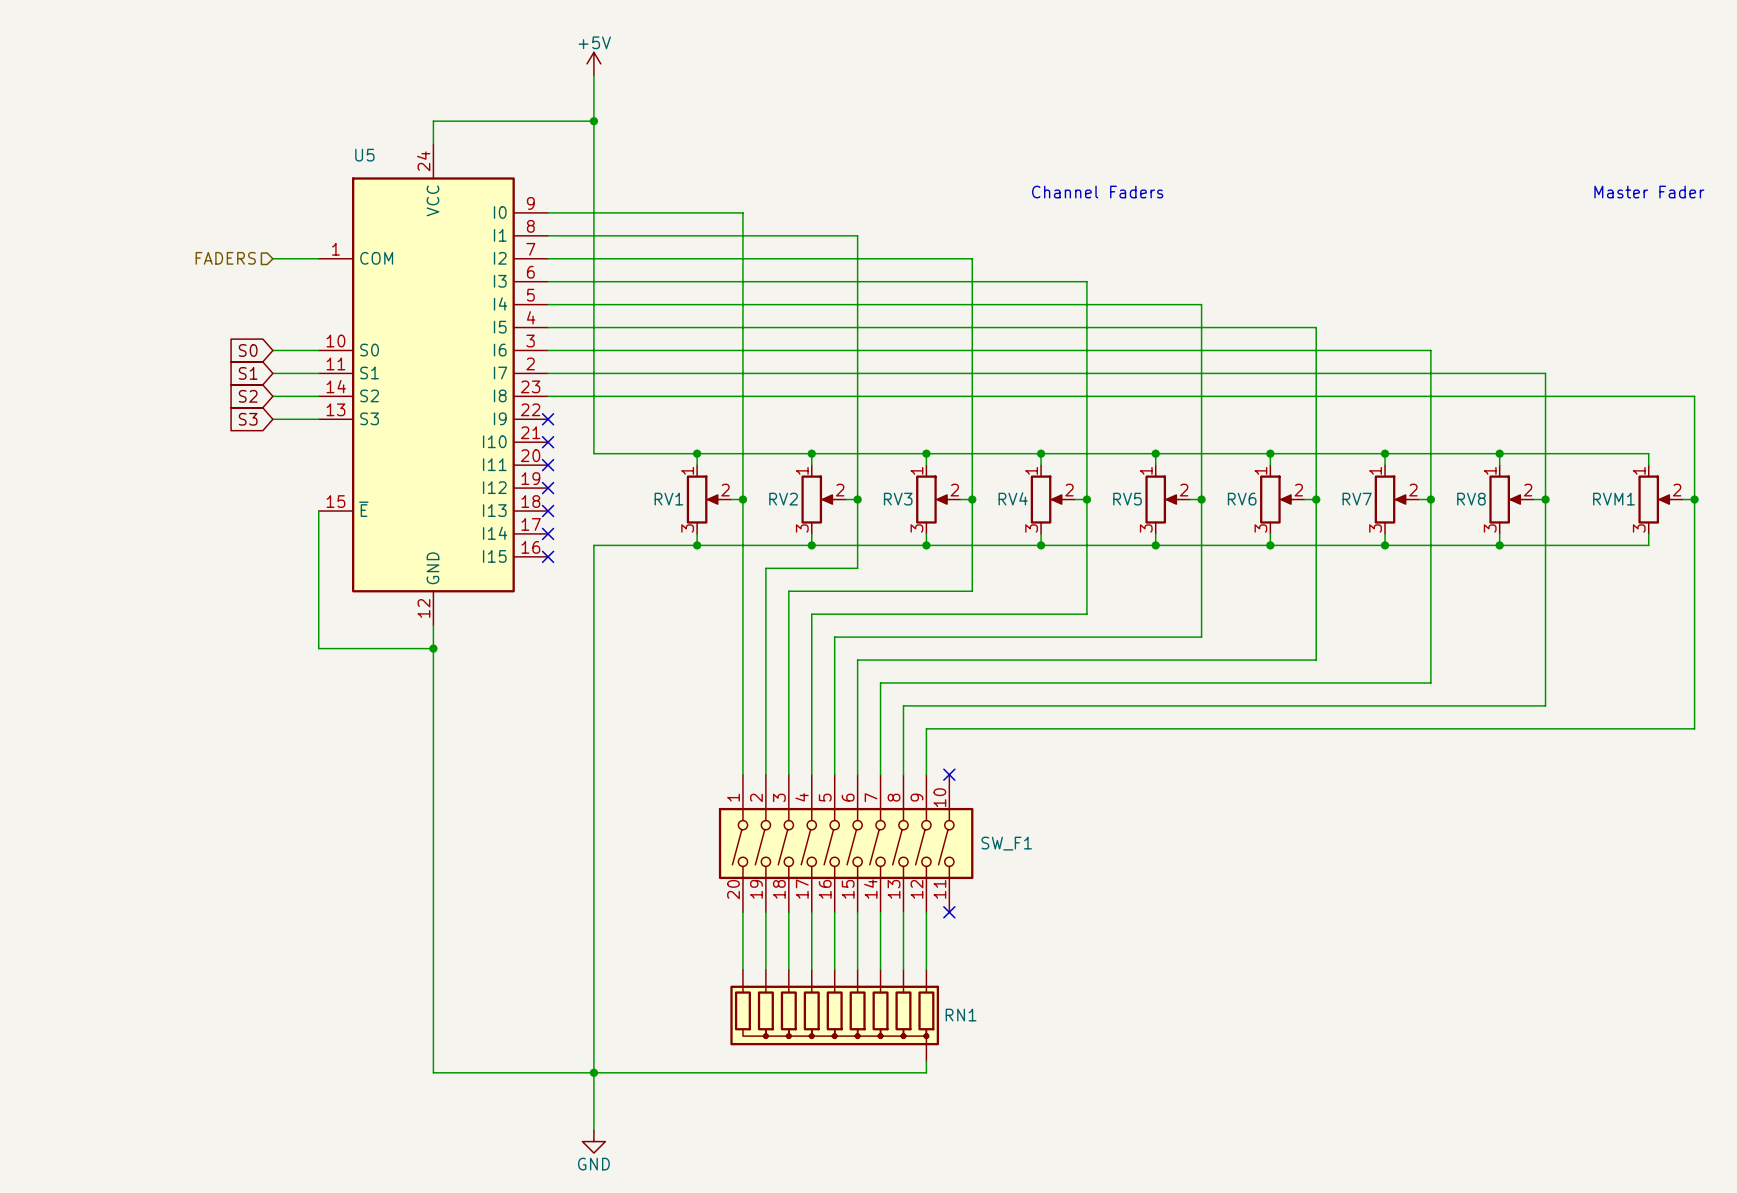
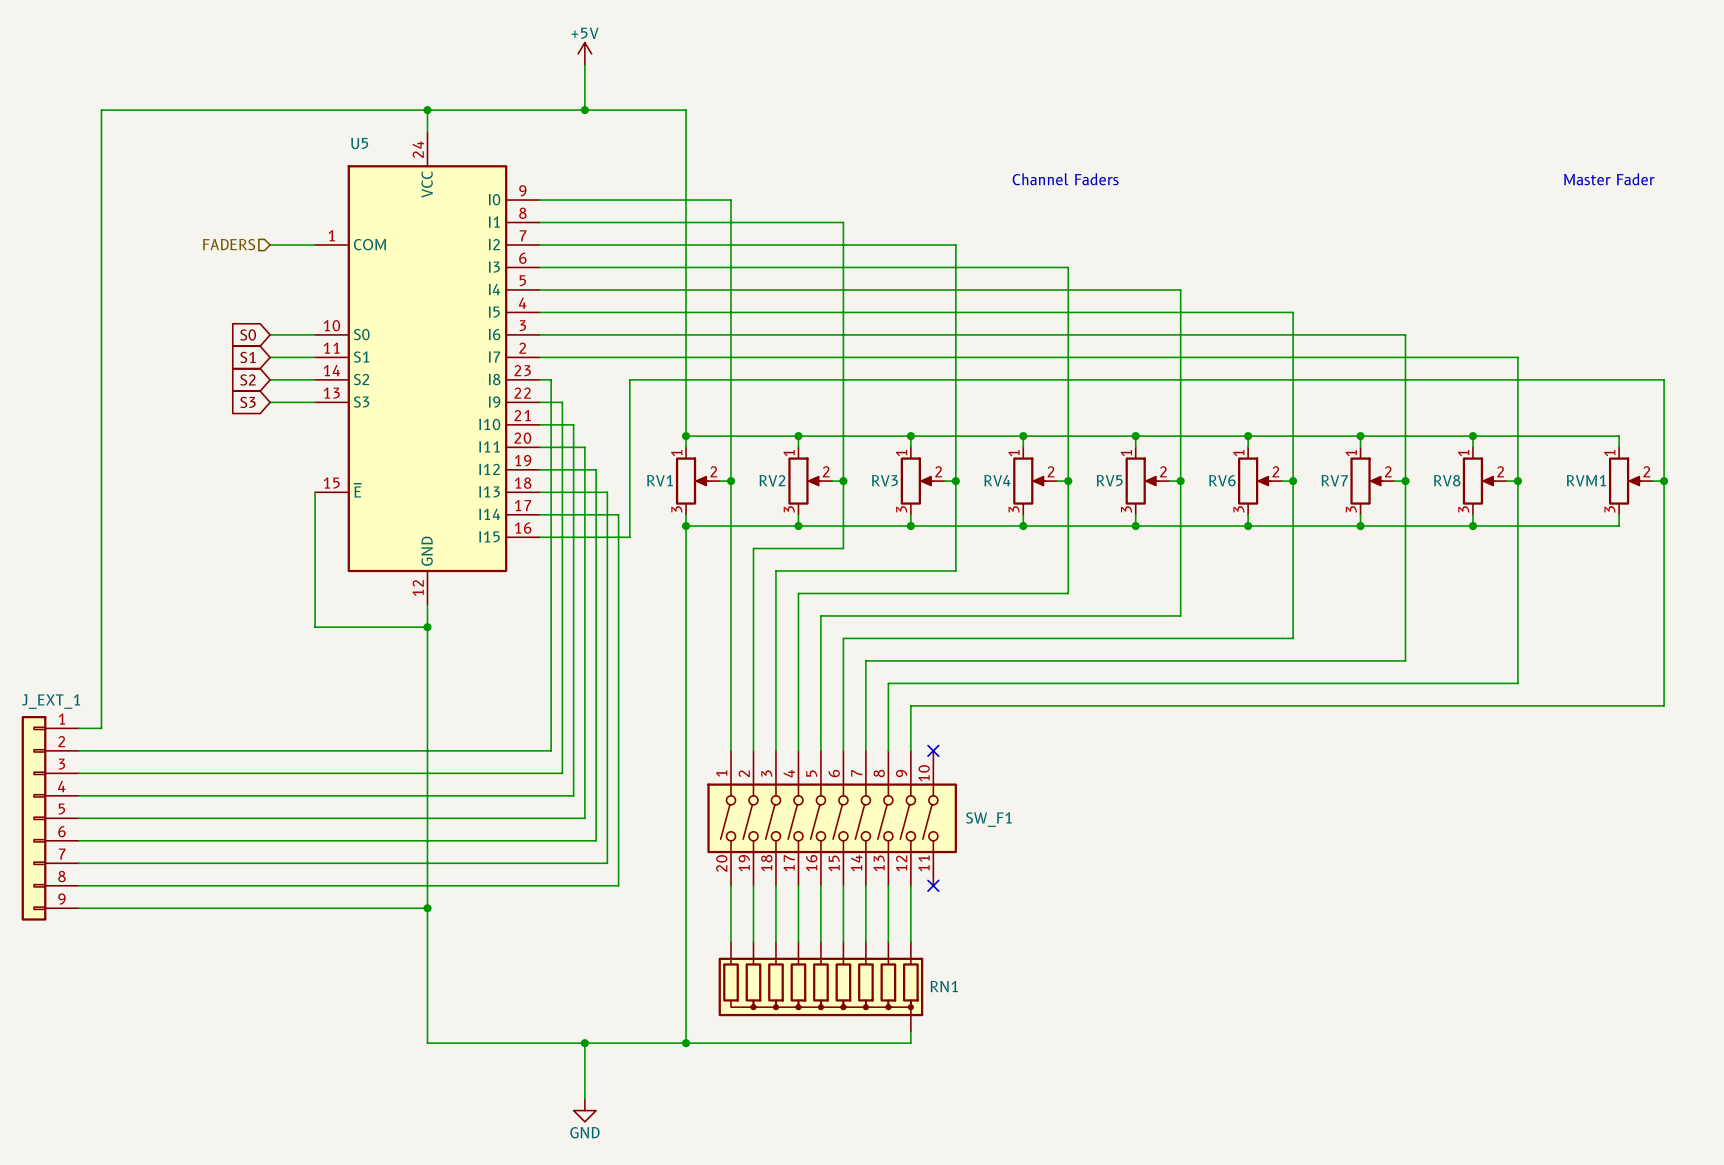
wire: none -> (427, 110) (101, 110) (101, 728) (78, 728)
junction: none -> (427, 110)
wire: (593, 121) (593, 453) (697, 453) -> (584, 110) (686, 110) (686, 436)
wire: (559, 396) (639, 396) -> (539, 537) (629, 537) (629, 379)
wire: none -> (551, 379) (551, 750) (78, 750)
wire: none -> (539, 402) (562, 402) (562, 773) (78, 773)
no-connect mark: (548, 419) -> none
wire: none -> (539, 424) (573, 424) (573, 795) (78, 795)
no-connect mark: (548, 442) -> none
no-connect mark: (548, 465) -> none
wire: none -> (539, 469) (596, 469) (596, 840) (78, 840)
no-connect mark: (548, 488) -> none
wire: none -> (539, 492) (607, 492) (607, 863) (78, 863)
no-connect mark: (548, 511) -> none
wire: none -> (539, 514) (618, 514) (618, 885) (78, 885)
no-connect mark: (548, 533) -> none
wire: (593, 545) (697, 545) -> (584, 526) (584, 447) (539, 447)
wire: none -> (686, 526) (686, 1043)
no-connect mark: (548, 556) -> none
J_EXT_1: none -> (50, 818)
wire: (593, 843) (593, 1072) -> (584, 818) (78, 818)
wire: none -> (78, 908) (427, 908)
junction: none -> (427, 908)
junction: none -> (686, 1043)

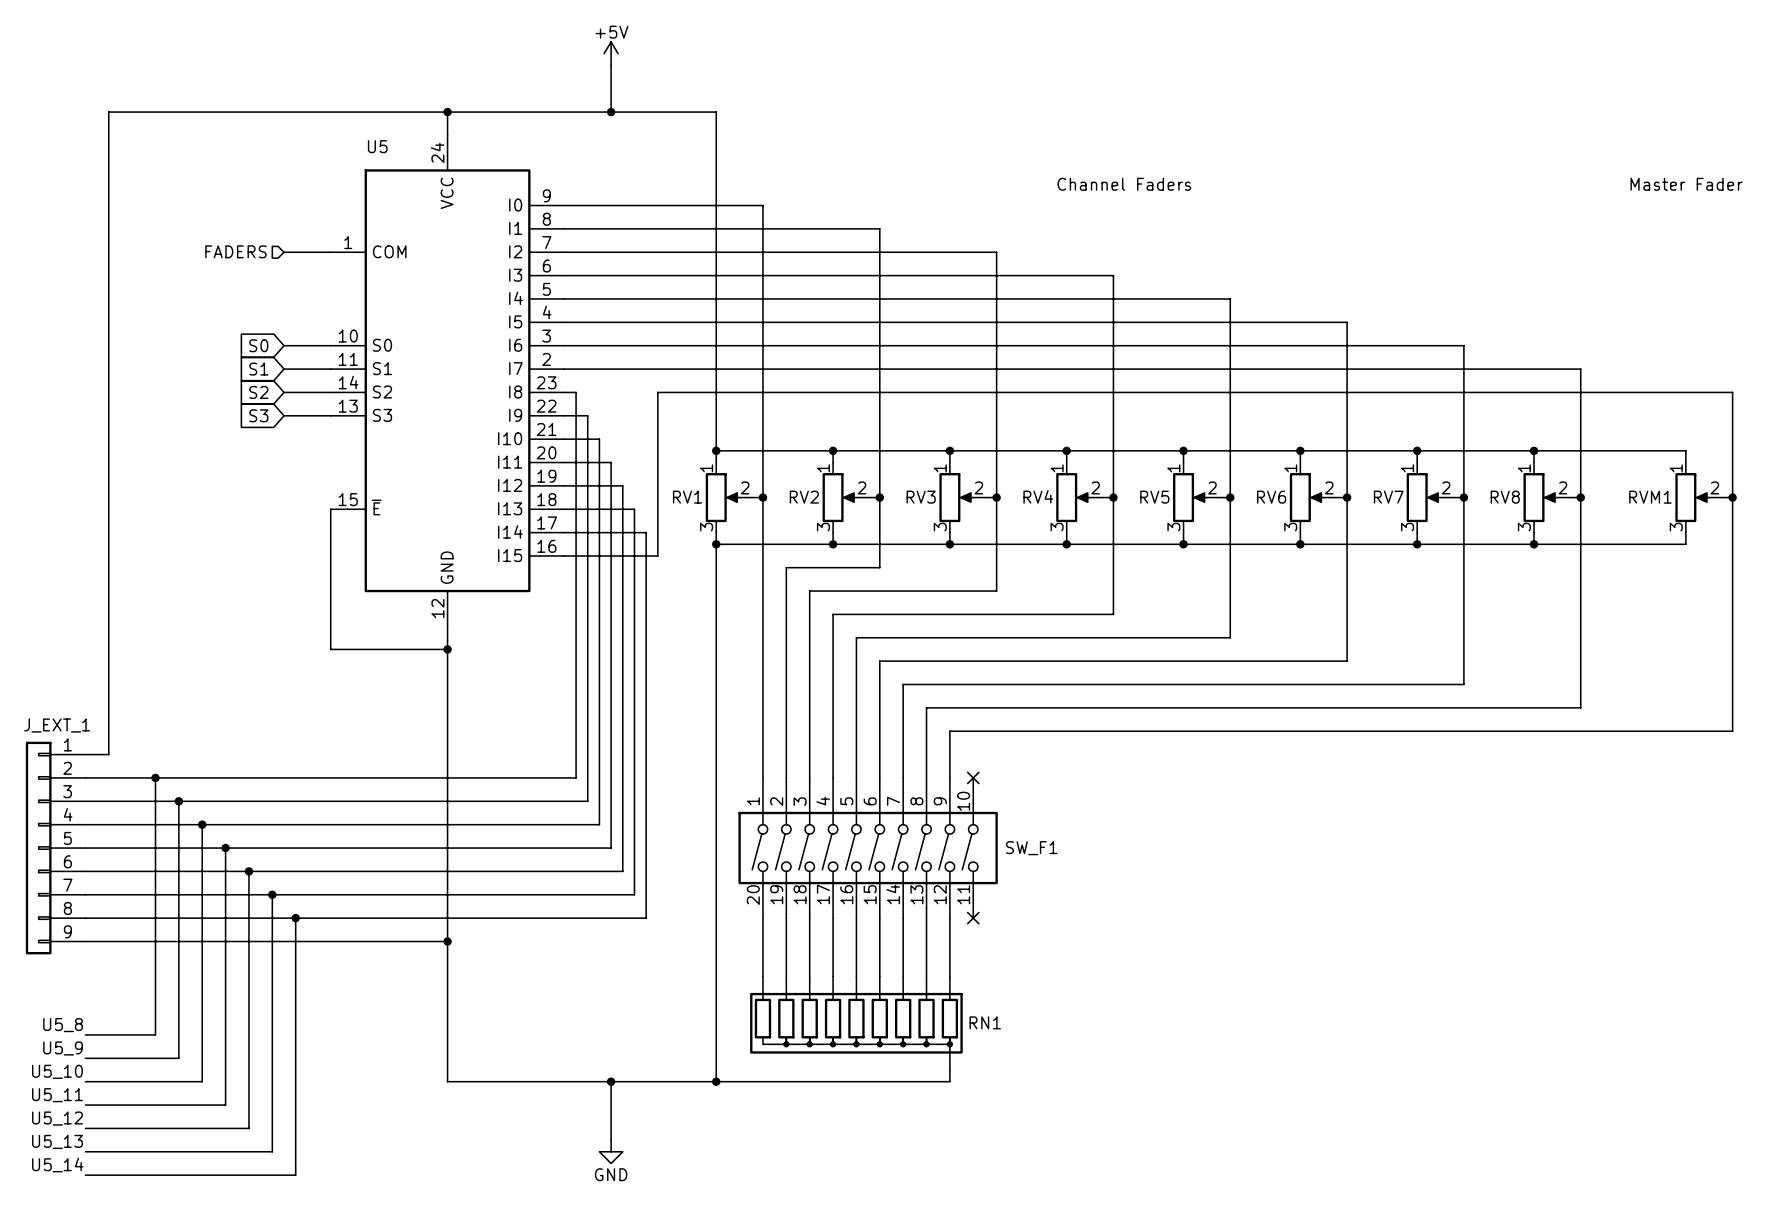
wire: none -> (155, 777) (155, 1034) (85, 1034)
junction: none -> (155, 777)
wire: none -> (178, 801) (178, 1058) (85, 1058)
junction: none -> (178, 801)
wire: none -> (202, 824) (202, 1081) (85, 1081)
junction: none -> (202, 824)
wire: none -> (225, 848) (225, 1105) (85, 1105)
junction: none -> (225, 848)
wire: none -> (248, 871) (248, 1128) (85, 1128)
junction: none -> (248, 871)
wire: none -> (272, 894) (272, 1151) (85, 1151)
junction: none -> (272, 894)
wire: none -> (295, 918) (295, 1175) (85, 1175)
junction: none -> (295, 918)
label: none -> U5_8 (63, 1025)
label: none -> U5_9 (63, 1048)
label: none -> U5_10 (57, 1071)
label: none -> U5_11 (57, 1095)
label: none -> U5_12 (57, 1118)
label: none -> U5_13 (57, 1141)
label: none -> U5_14 (57, 1165)

